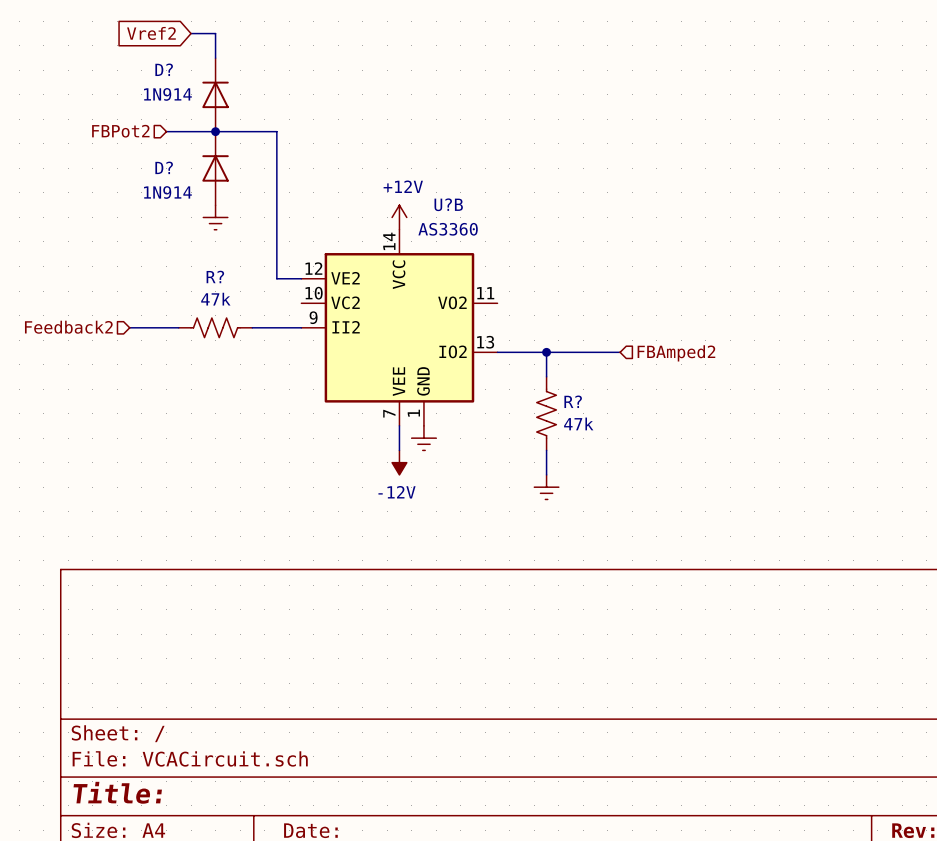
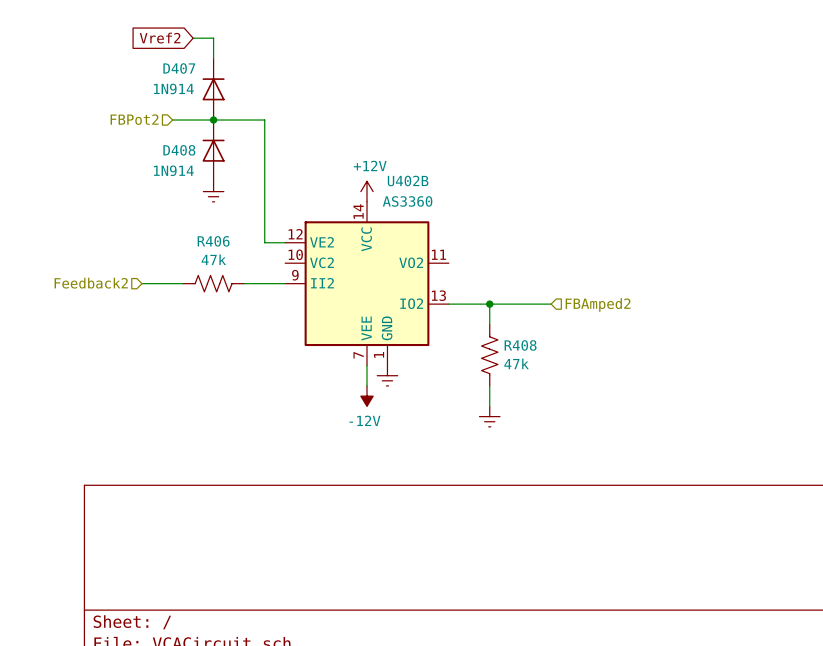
D? name: D? (164, 69) -> D407 (179, 68)
D? name: D? (164, 167) -> D408 (179, 150)
U?B name: U?B (448, 204) -> U402B (408, 181)
R? name: R? (215, 276) -> R406 (213, 241)
R? name: R? (573, 401) -> R408 (520, 345)

